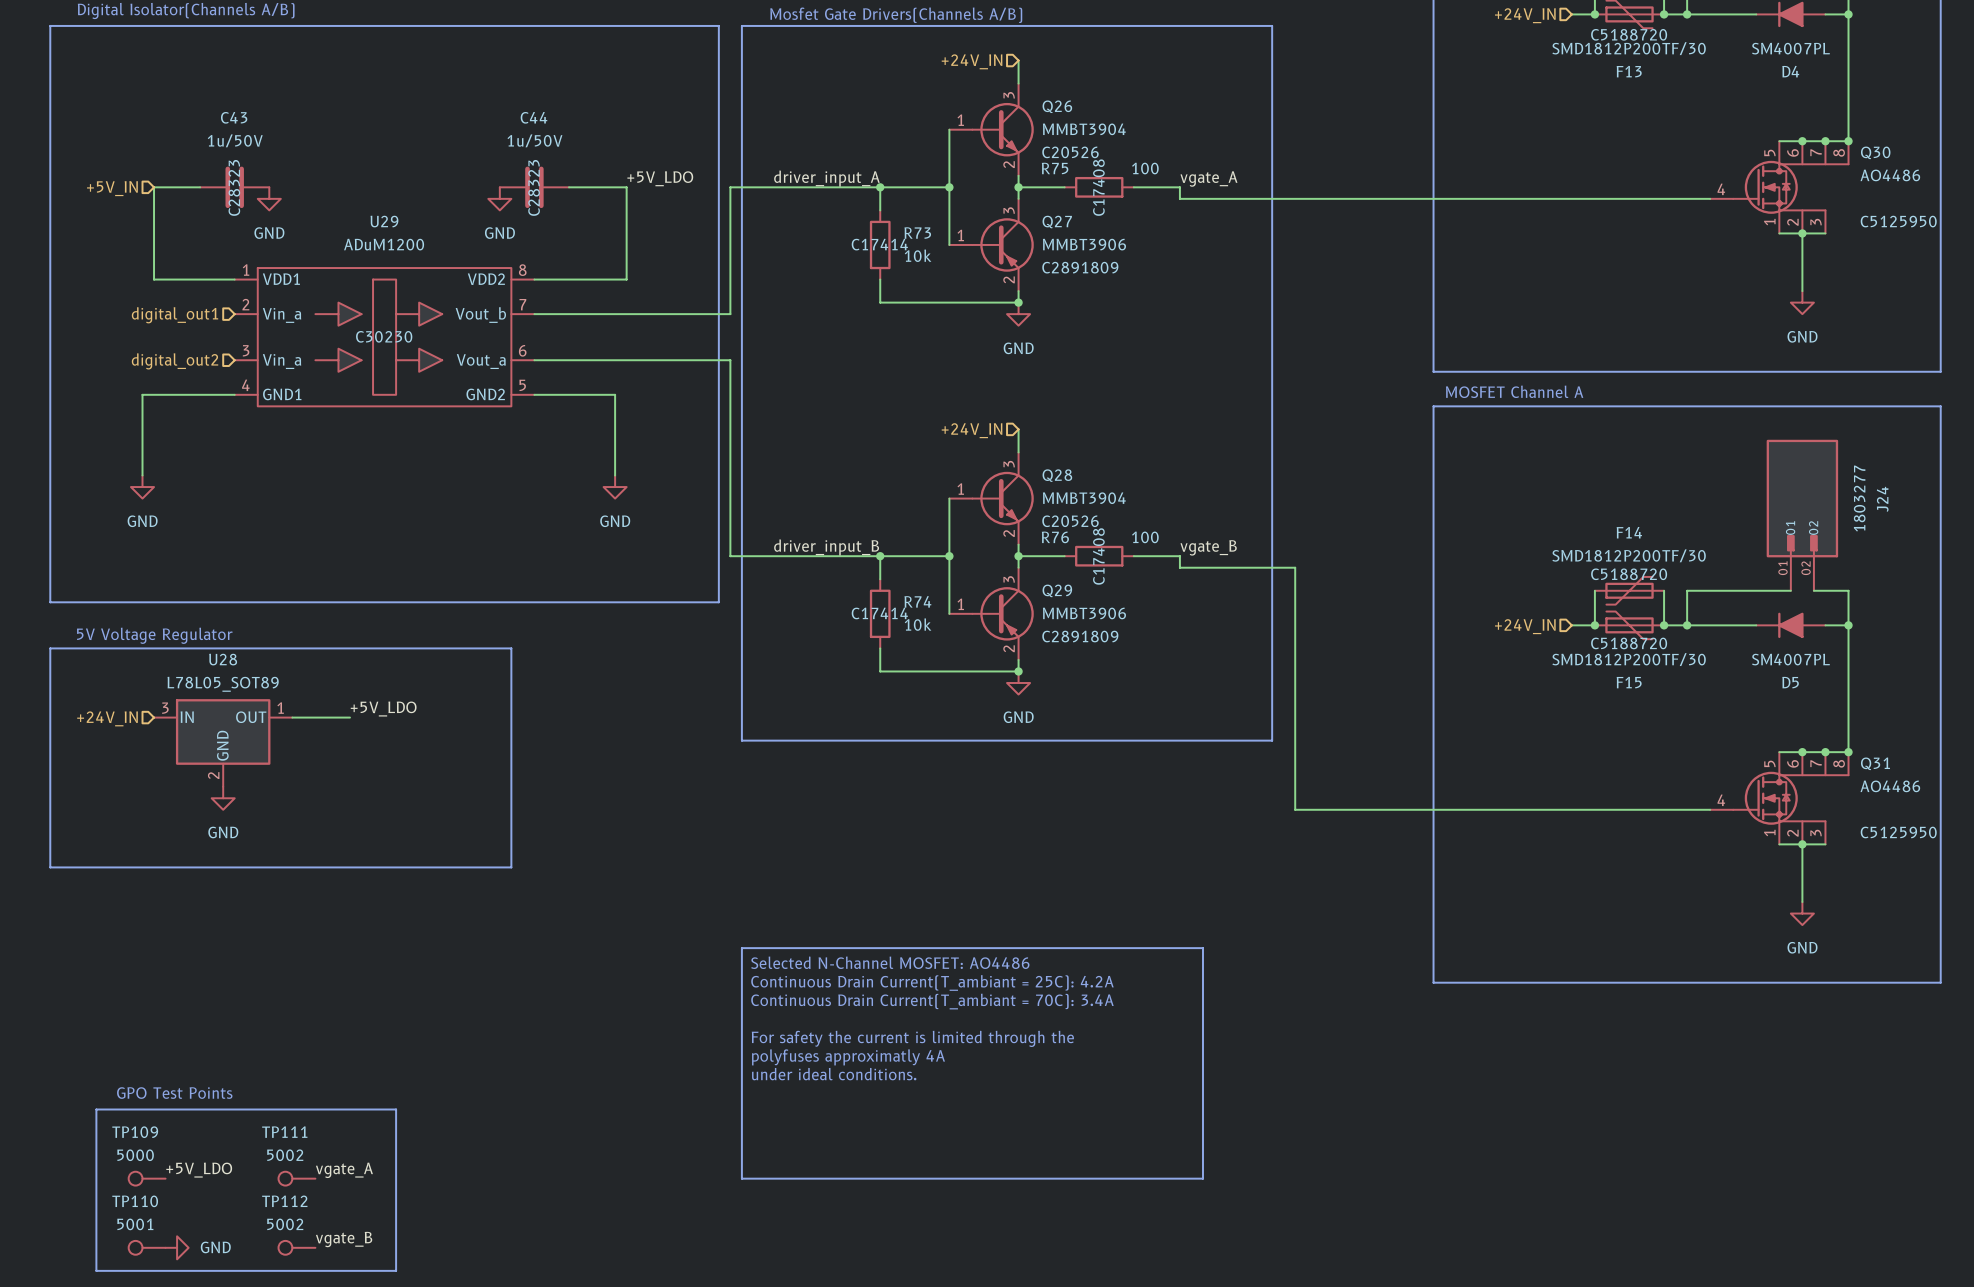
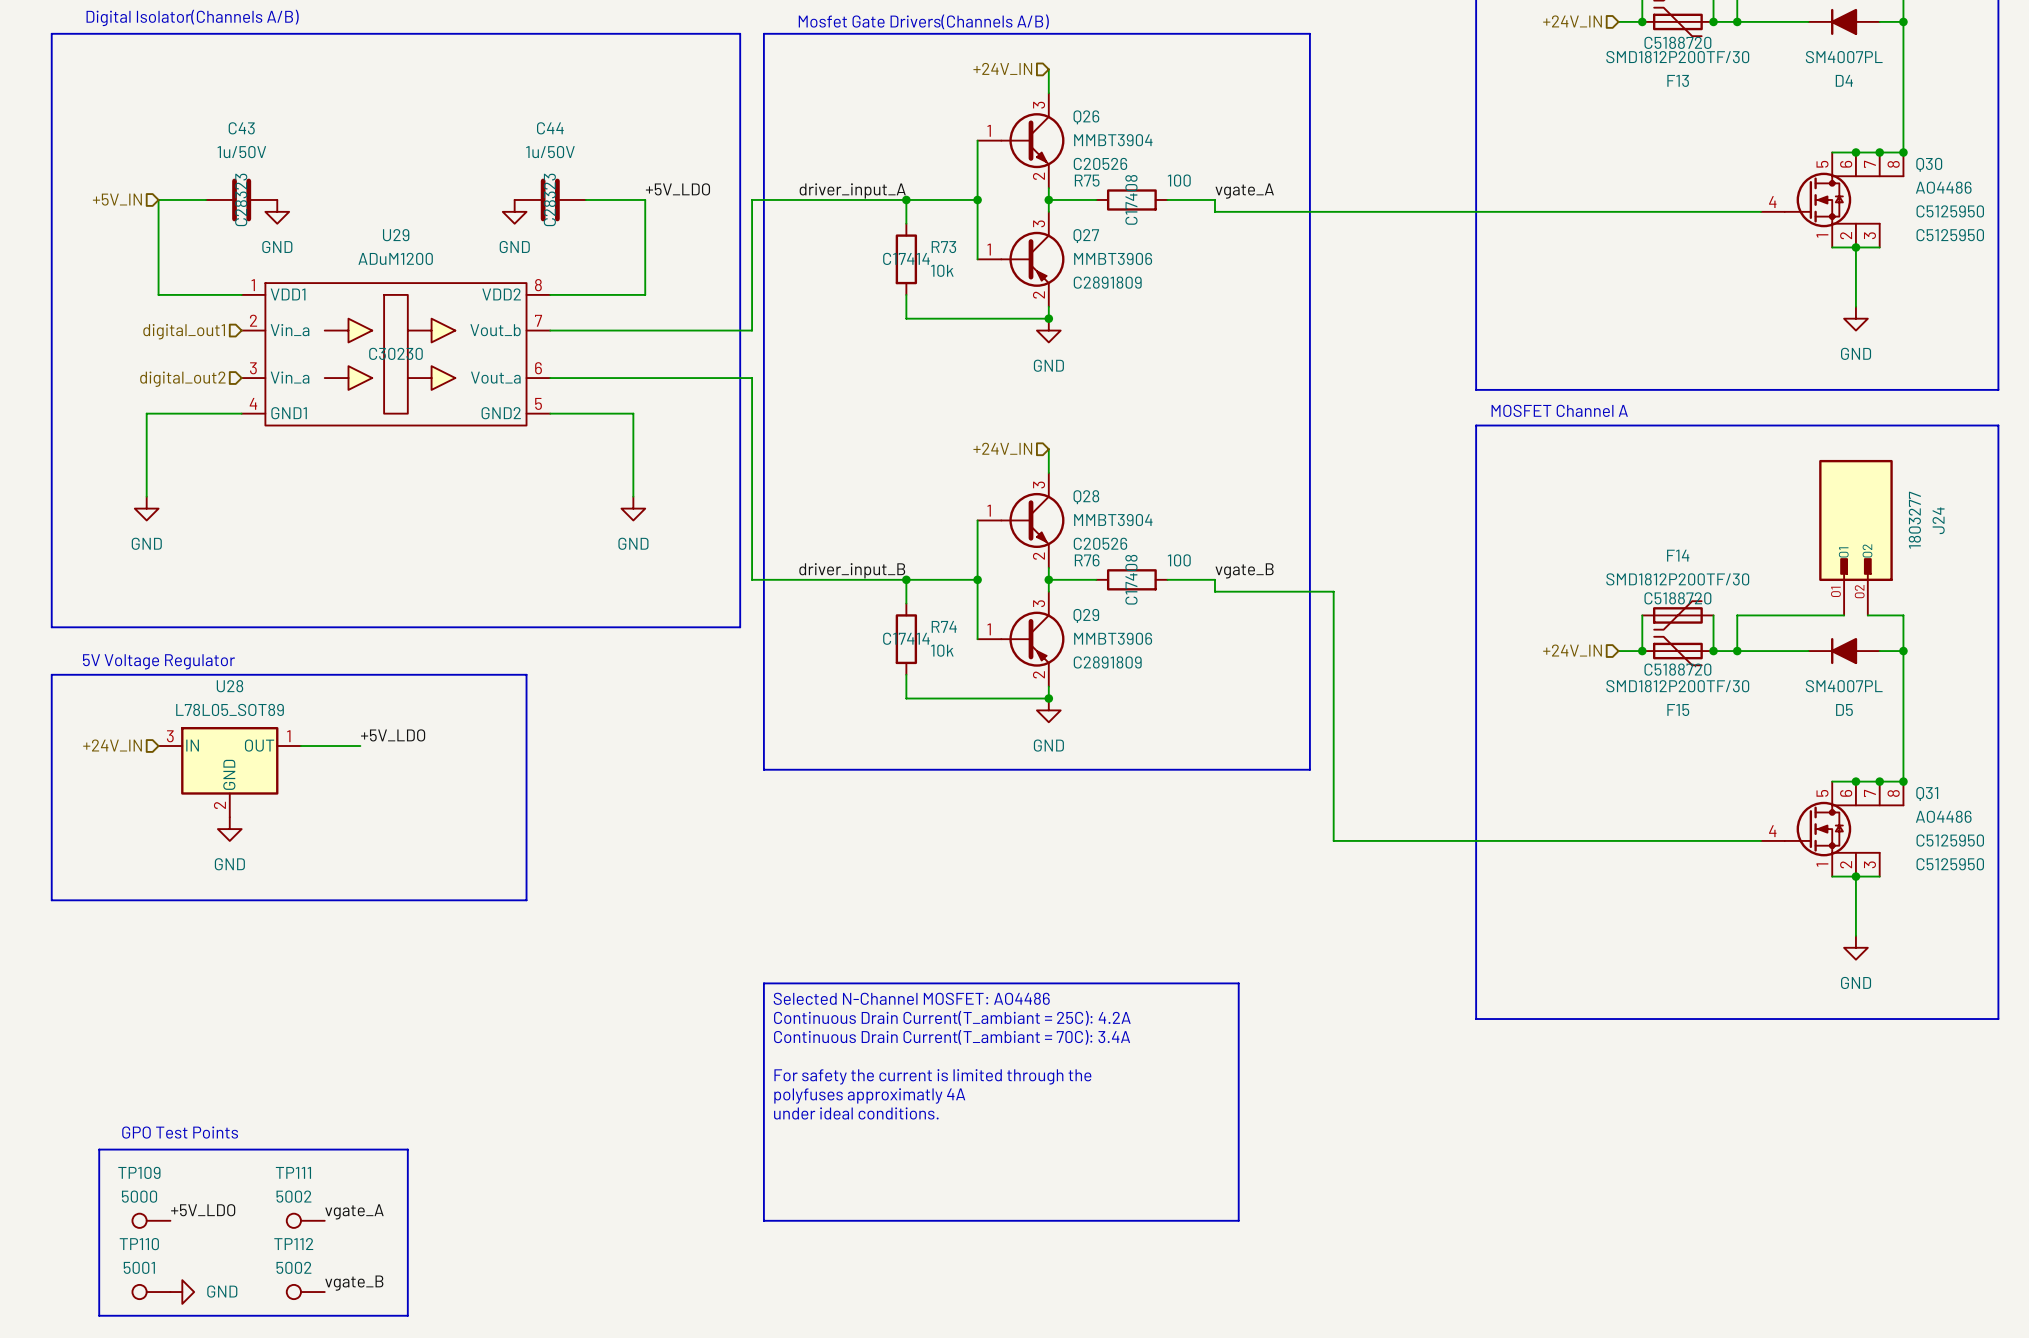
Q30 text: none -> C5125950 (1950, 211)
Q31 text: none -> C5125950 (1950, 840)

